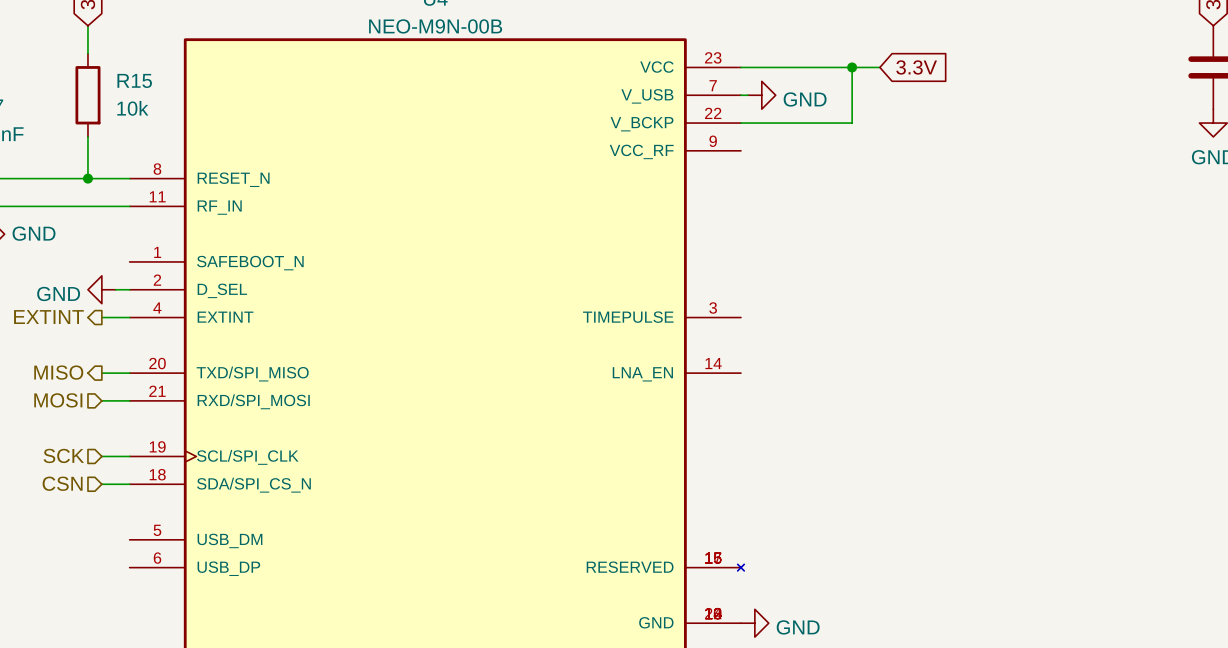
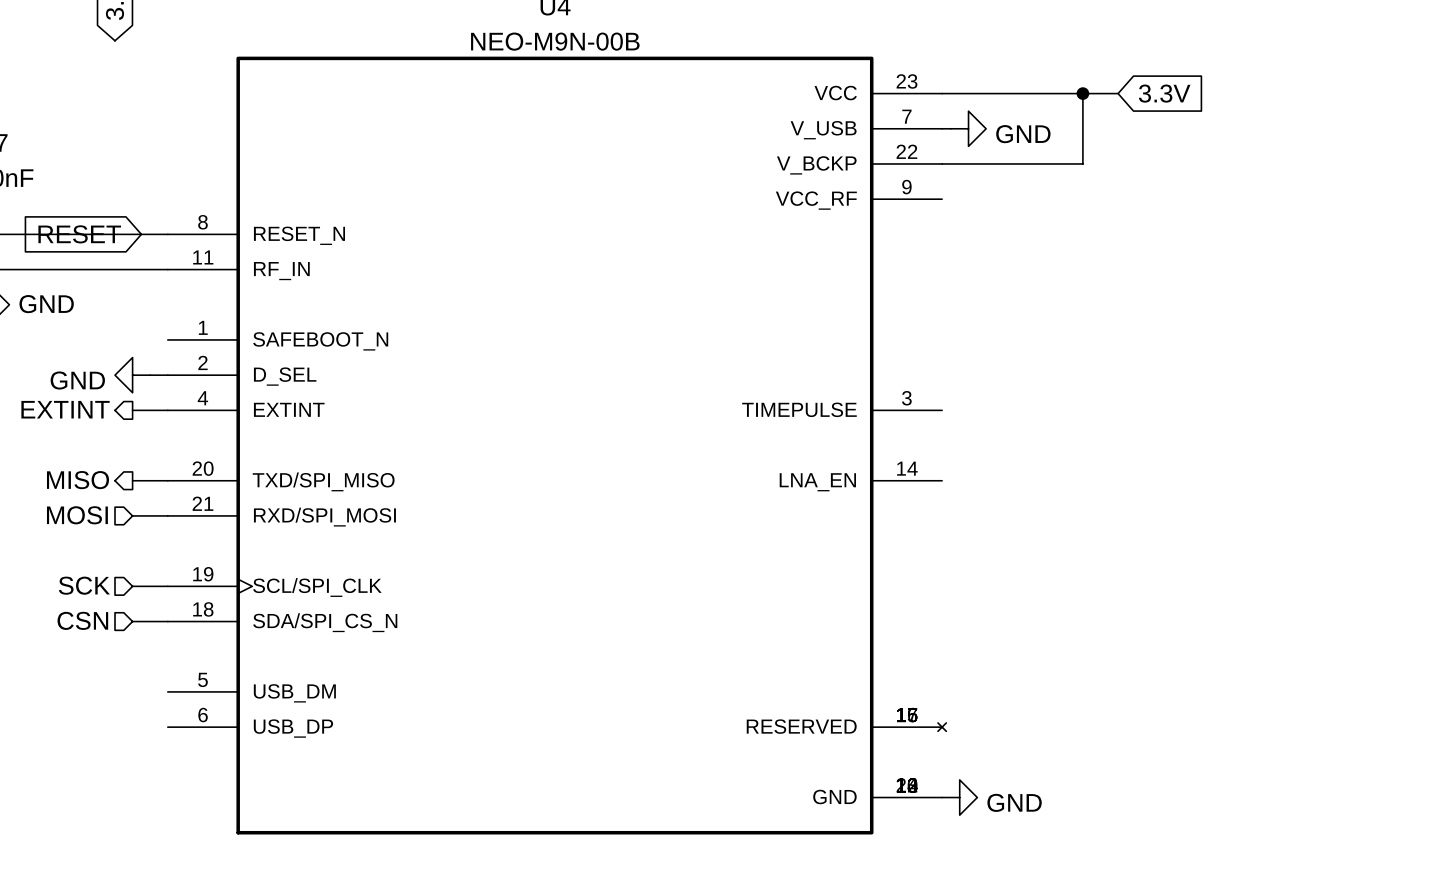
wire: (87, 25) (87, 53) -> none
R15: 10k (87, 95) -> none
wire: (87, 136) (87, 178) -> none
global label: none -> RESET (79, 234)
junction: (87, 178) -> none

